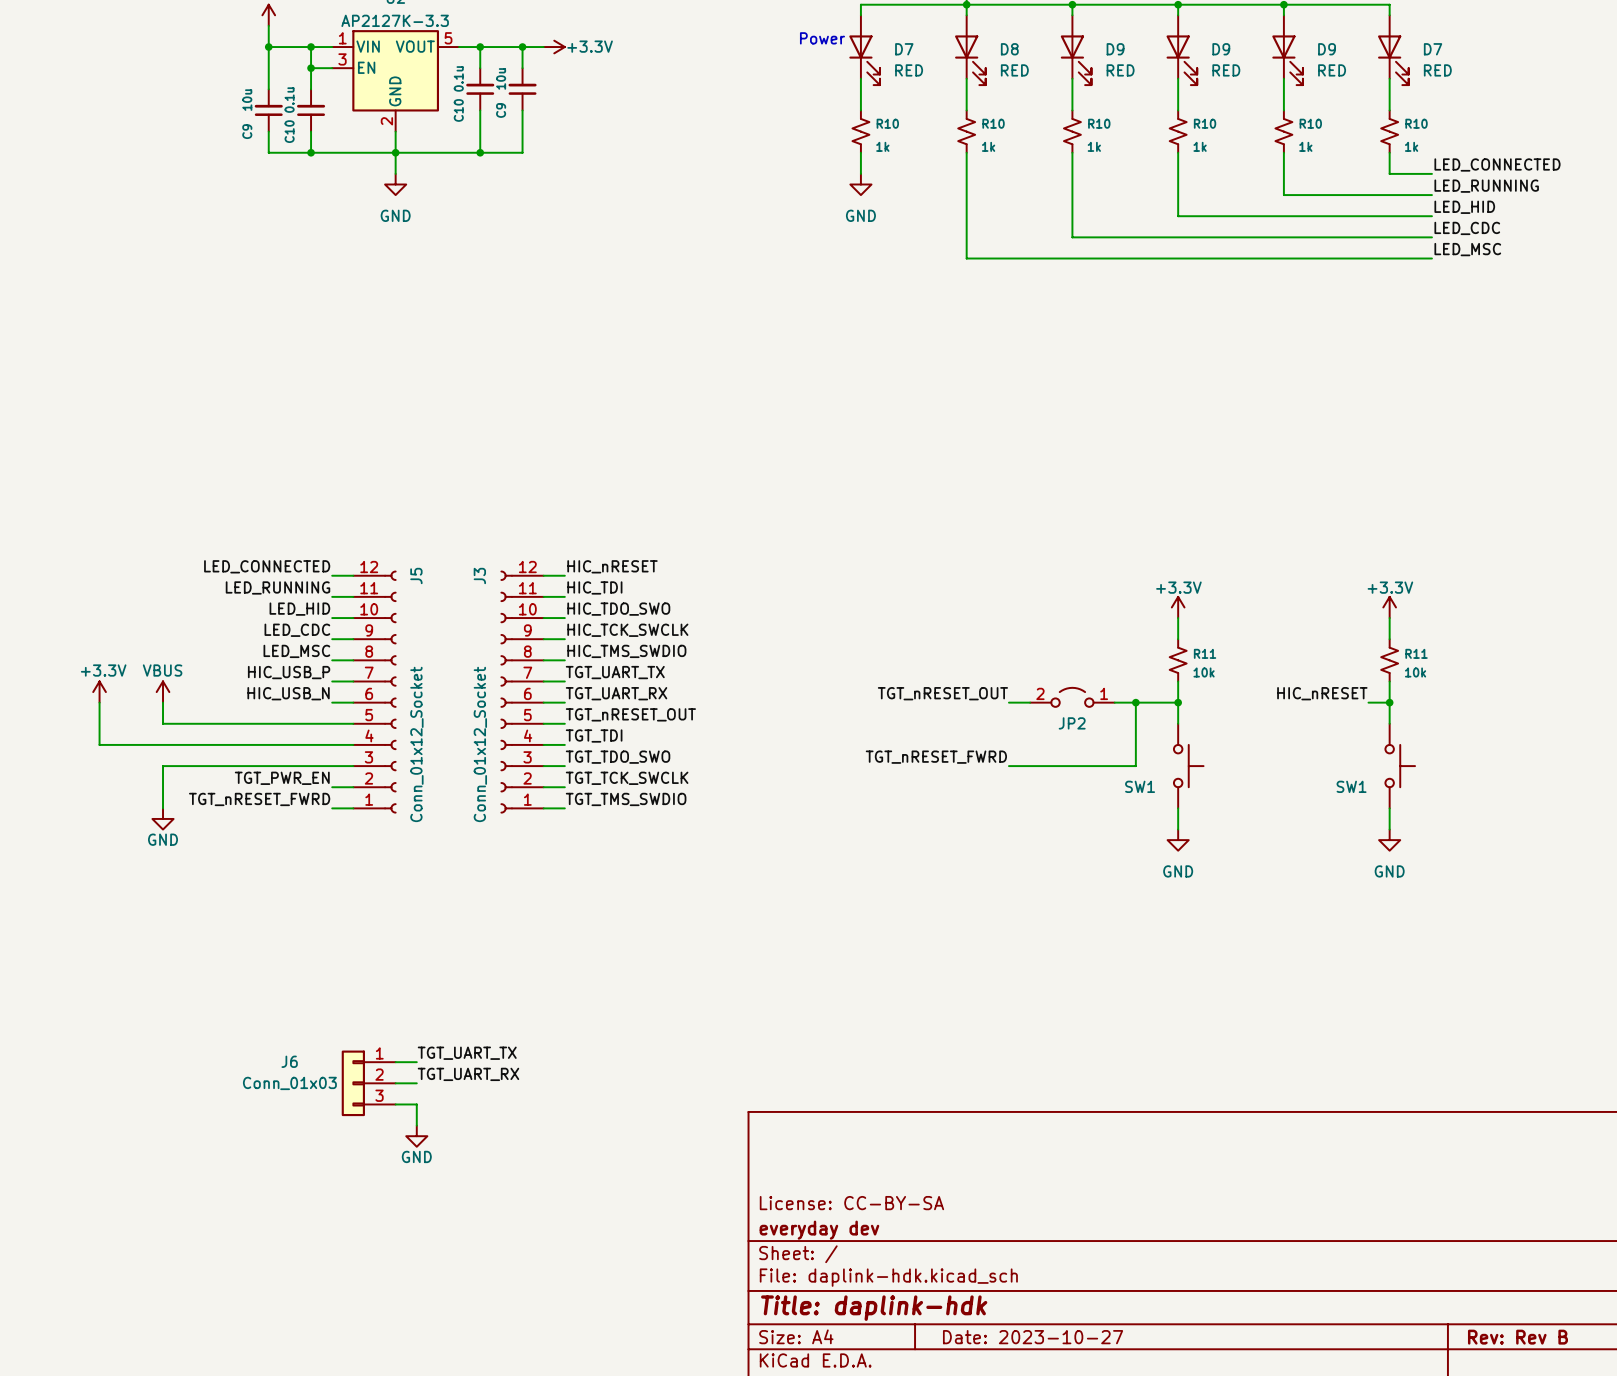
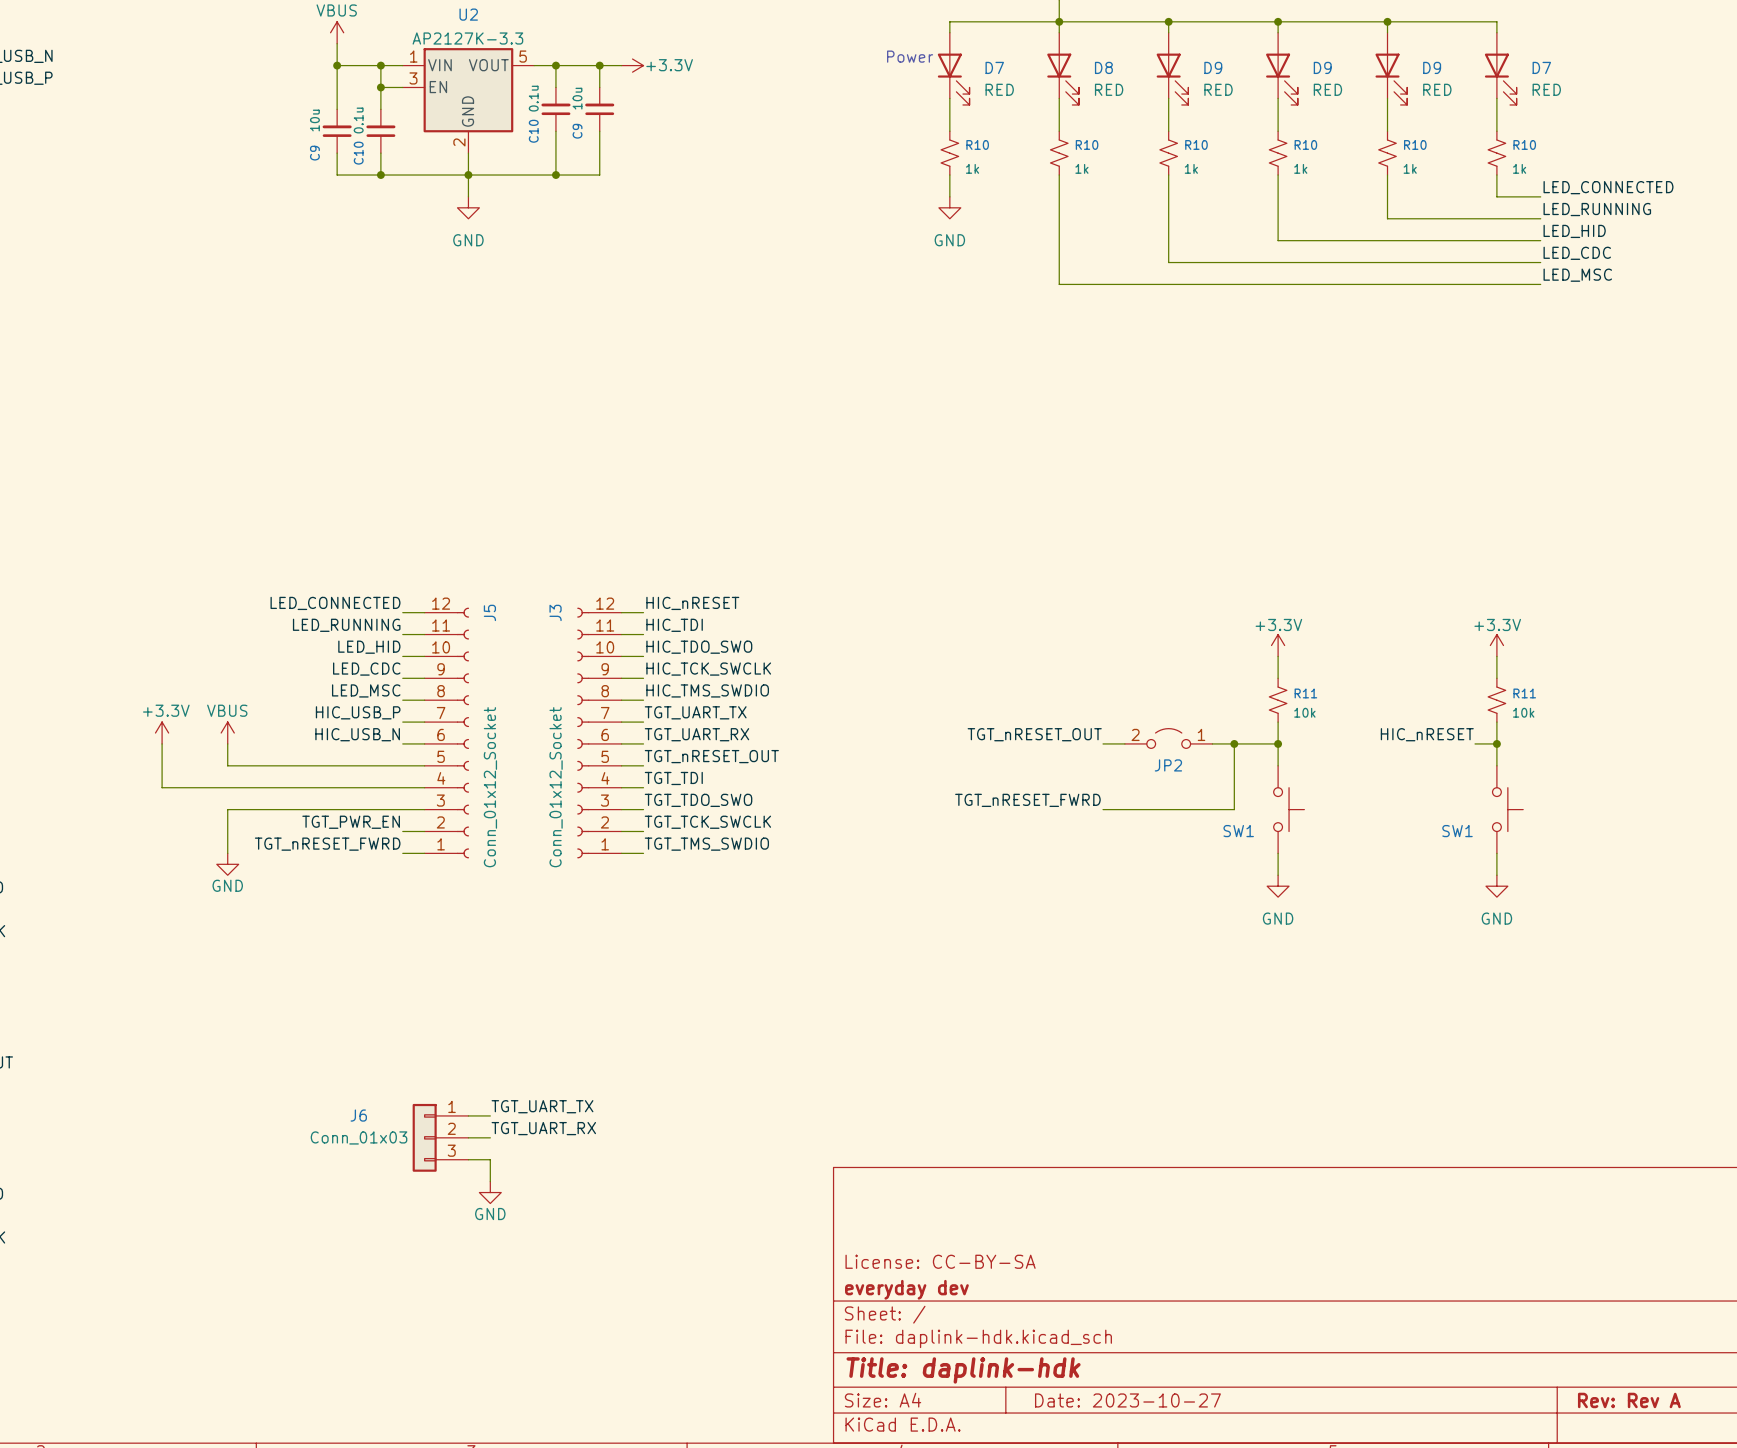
title block: Rev: Rev B (1517, 1337) -> Rev: Rev A (1629, 1400)

